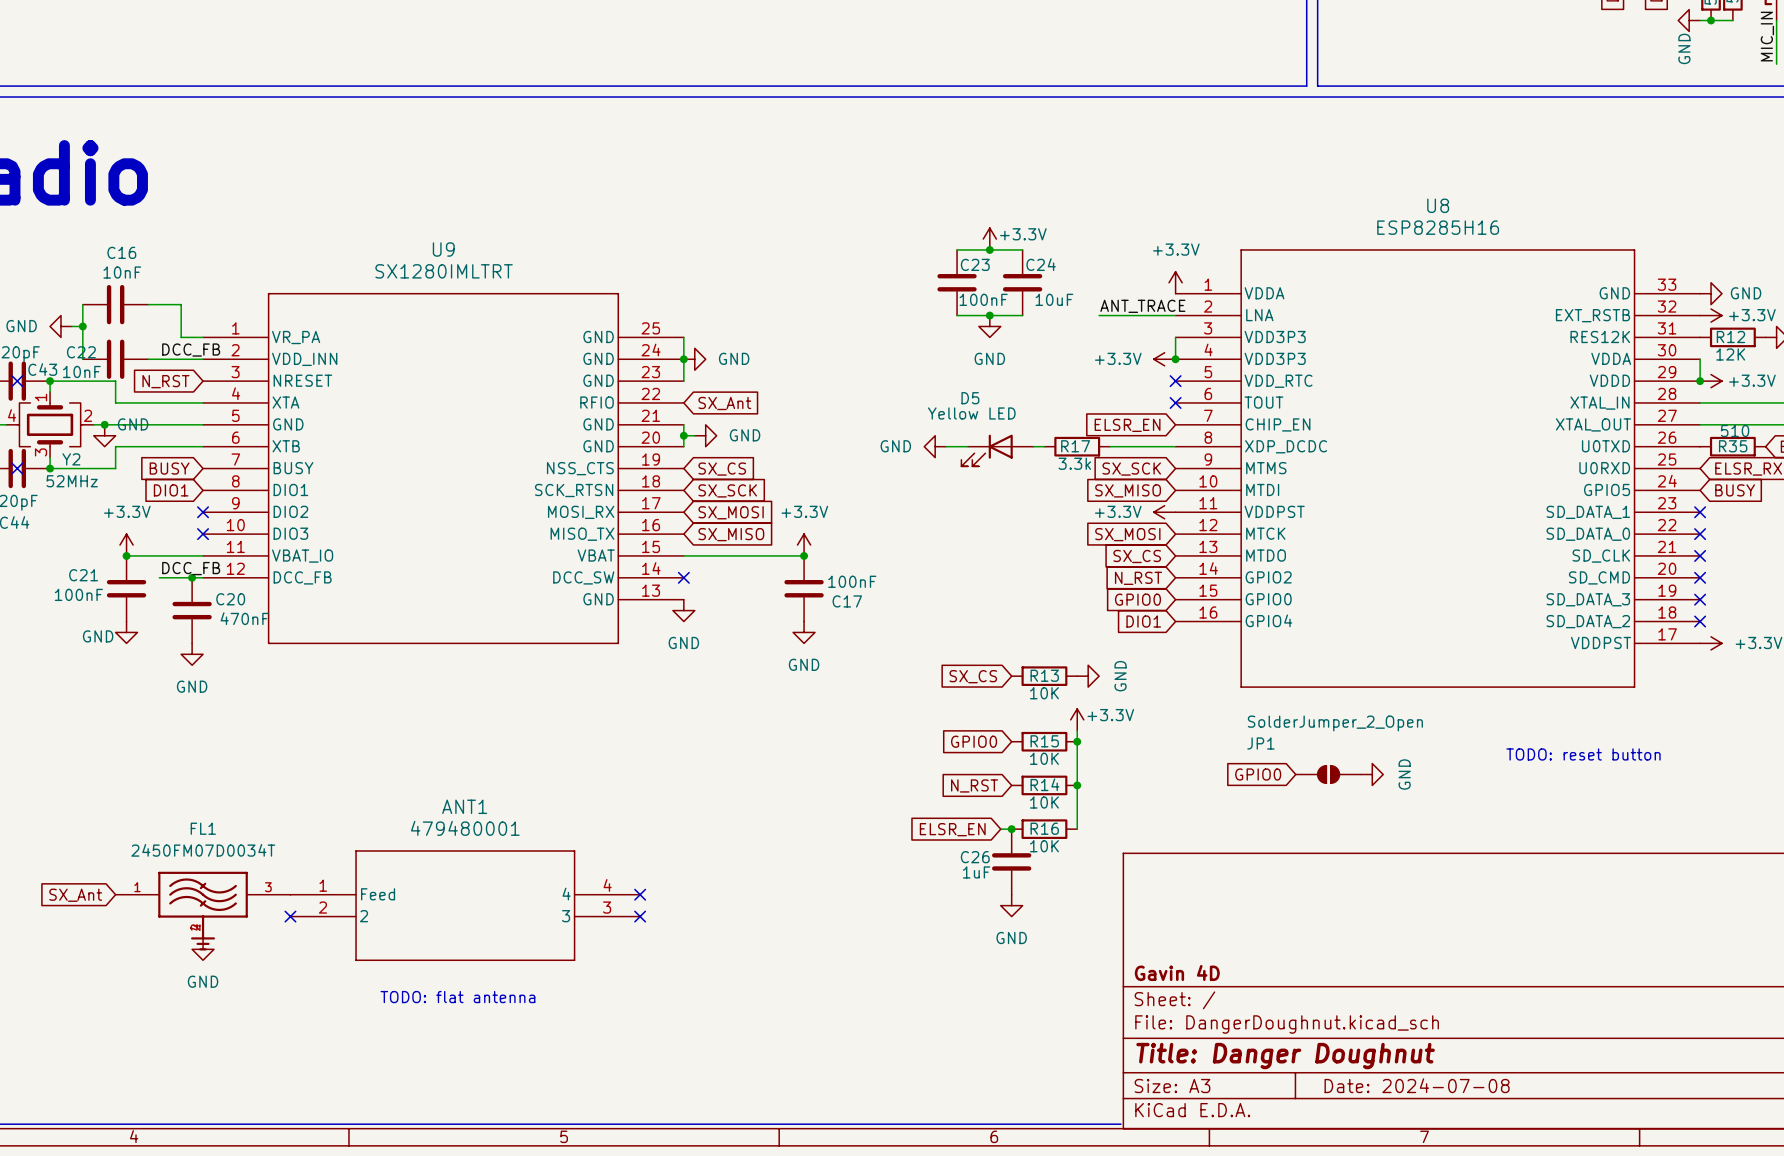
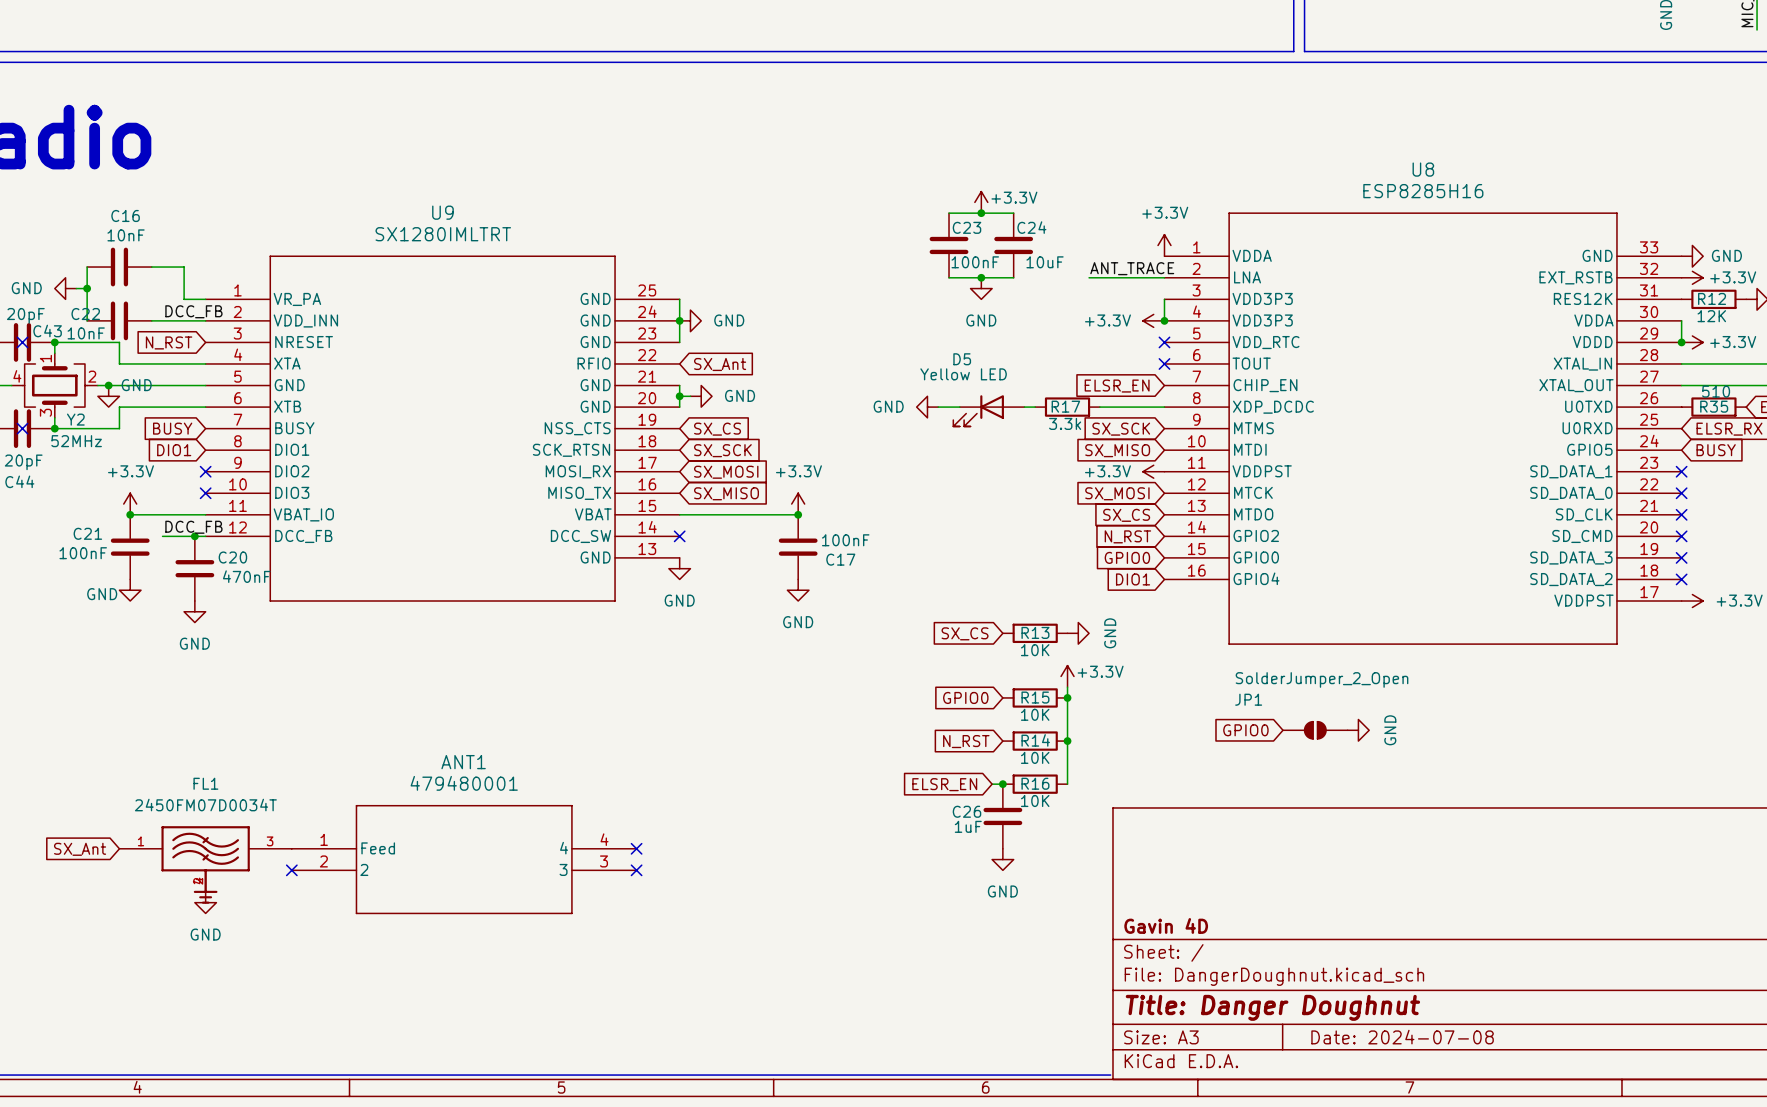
text: TODO: reset button (1583, 754) -> none
text: TODO: flat antenna (457, 997) -> none

